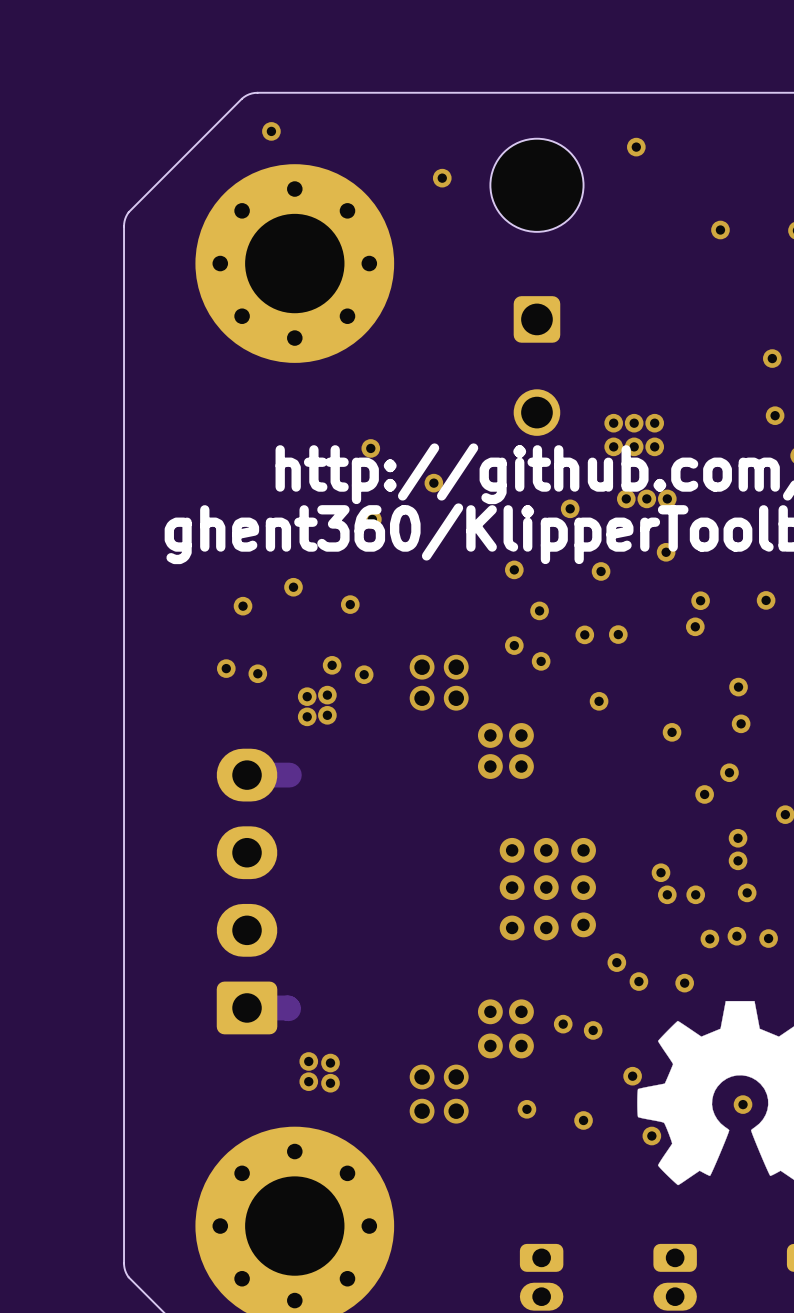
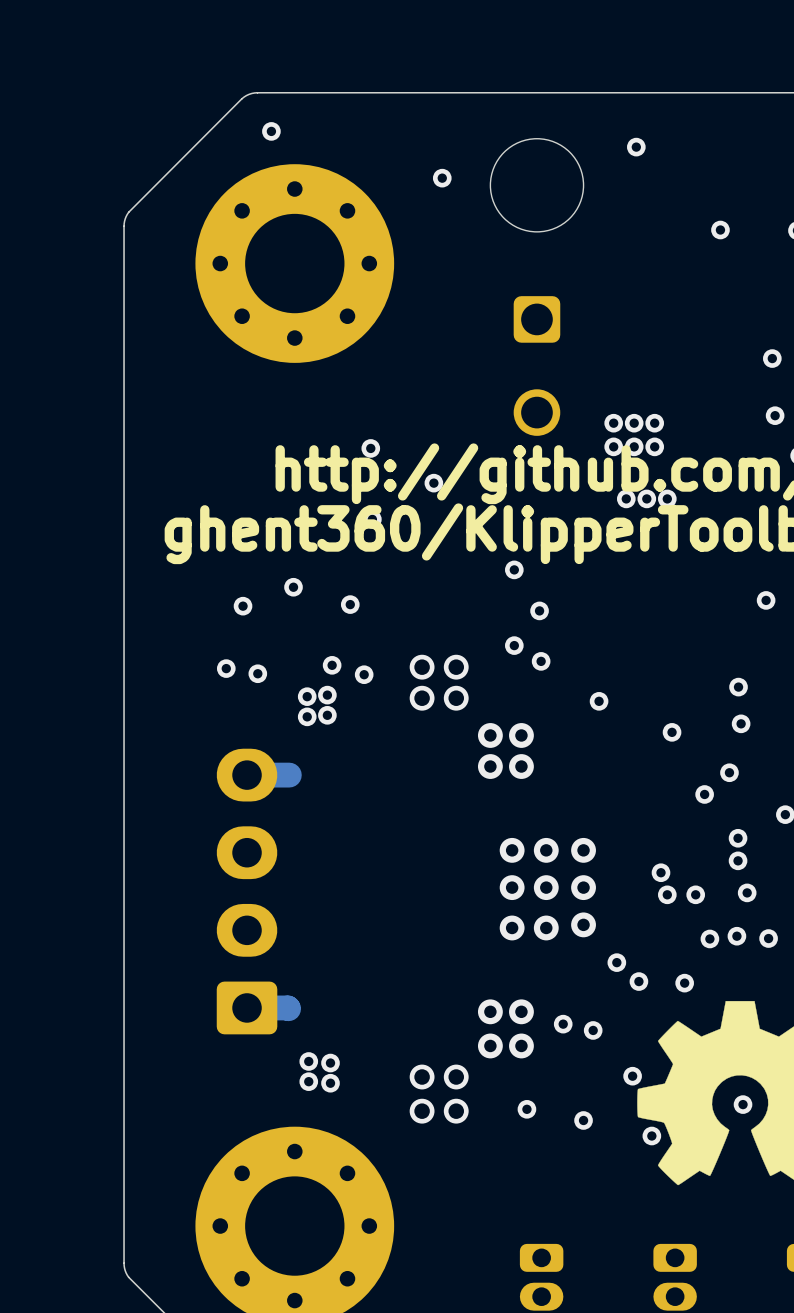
via: (570, 508) -> none
via: (666, 552) -> none
via: (601, 571) -> none
via: (700, 600) -> none
via: (695, 626) -> none
via: (584, 634) -> none
via: (618, 634) -> none

